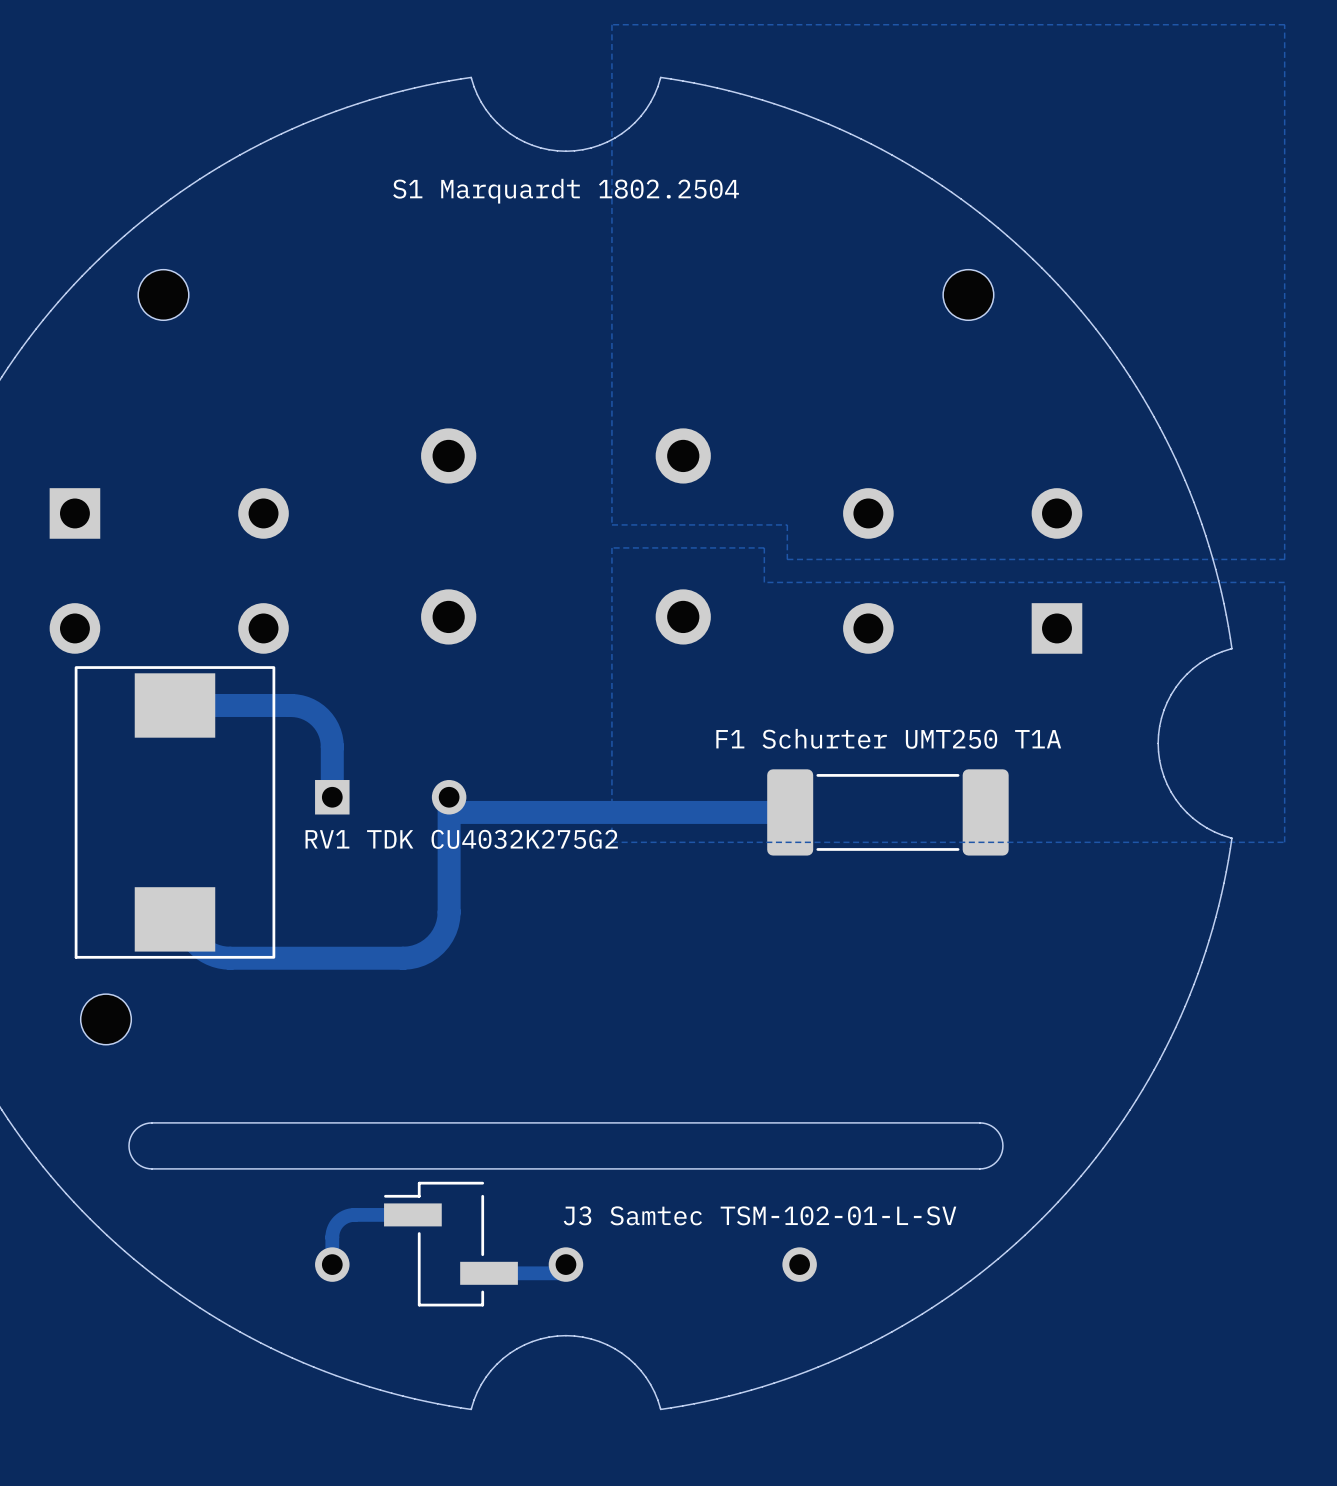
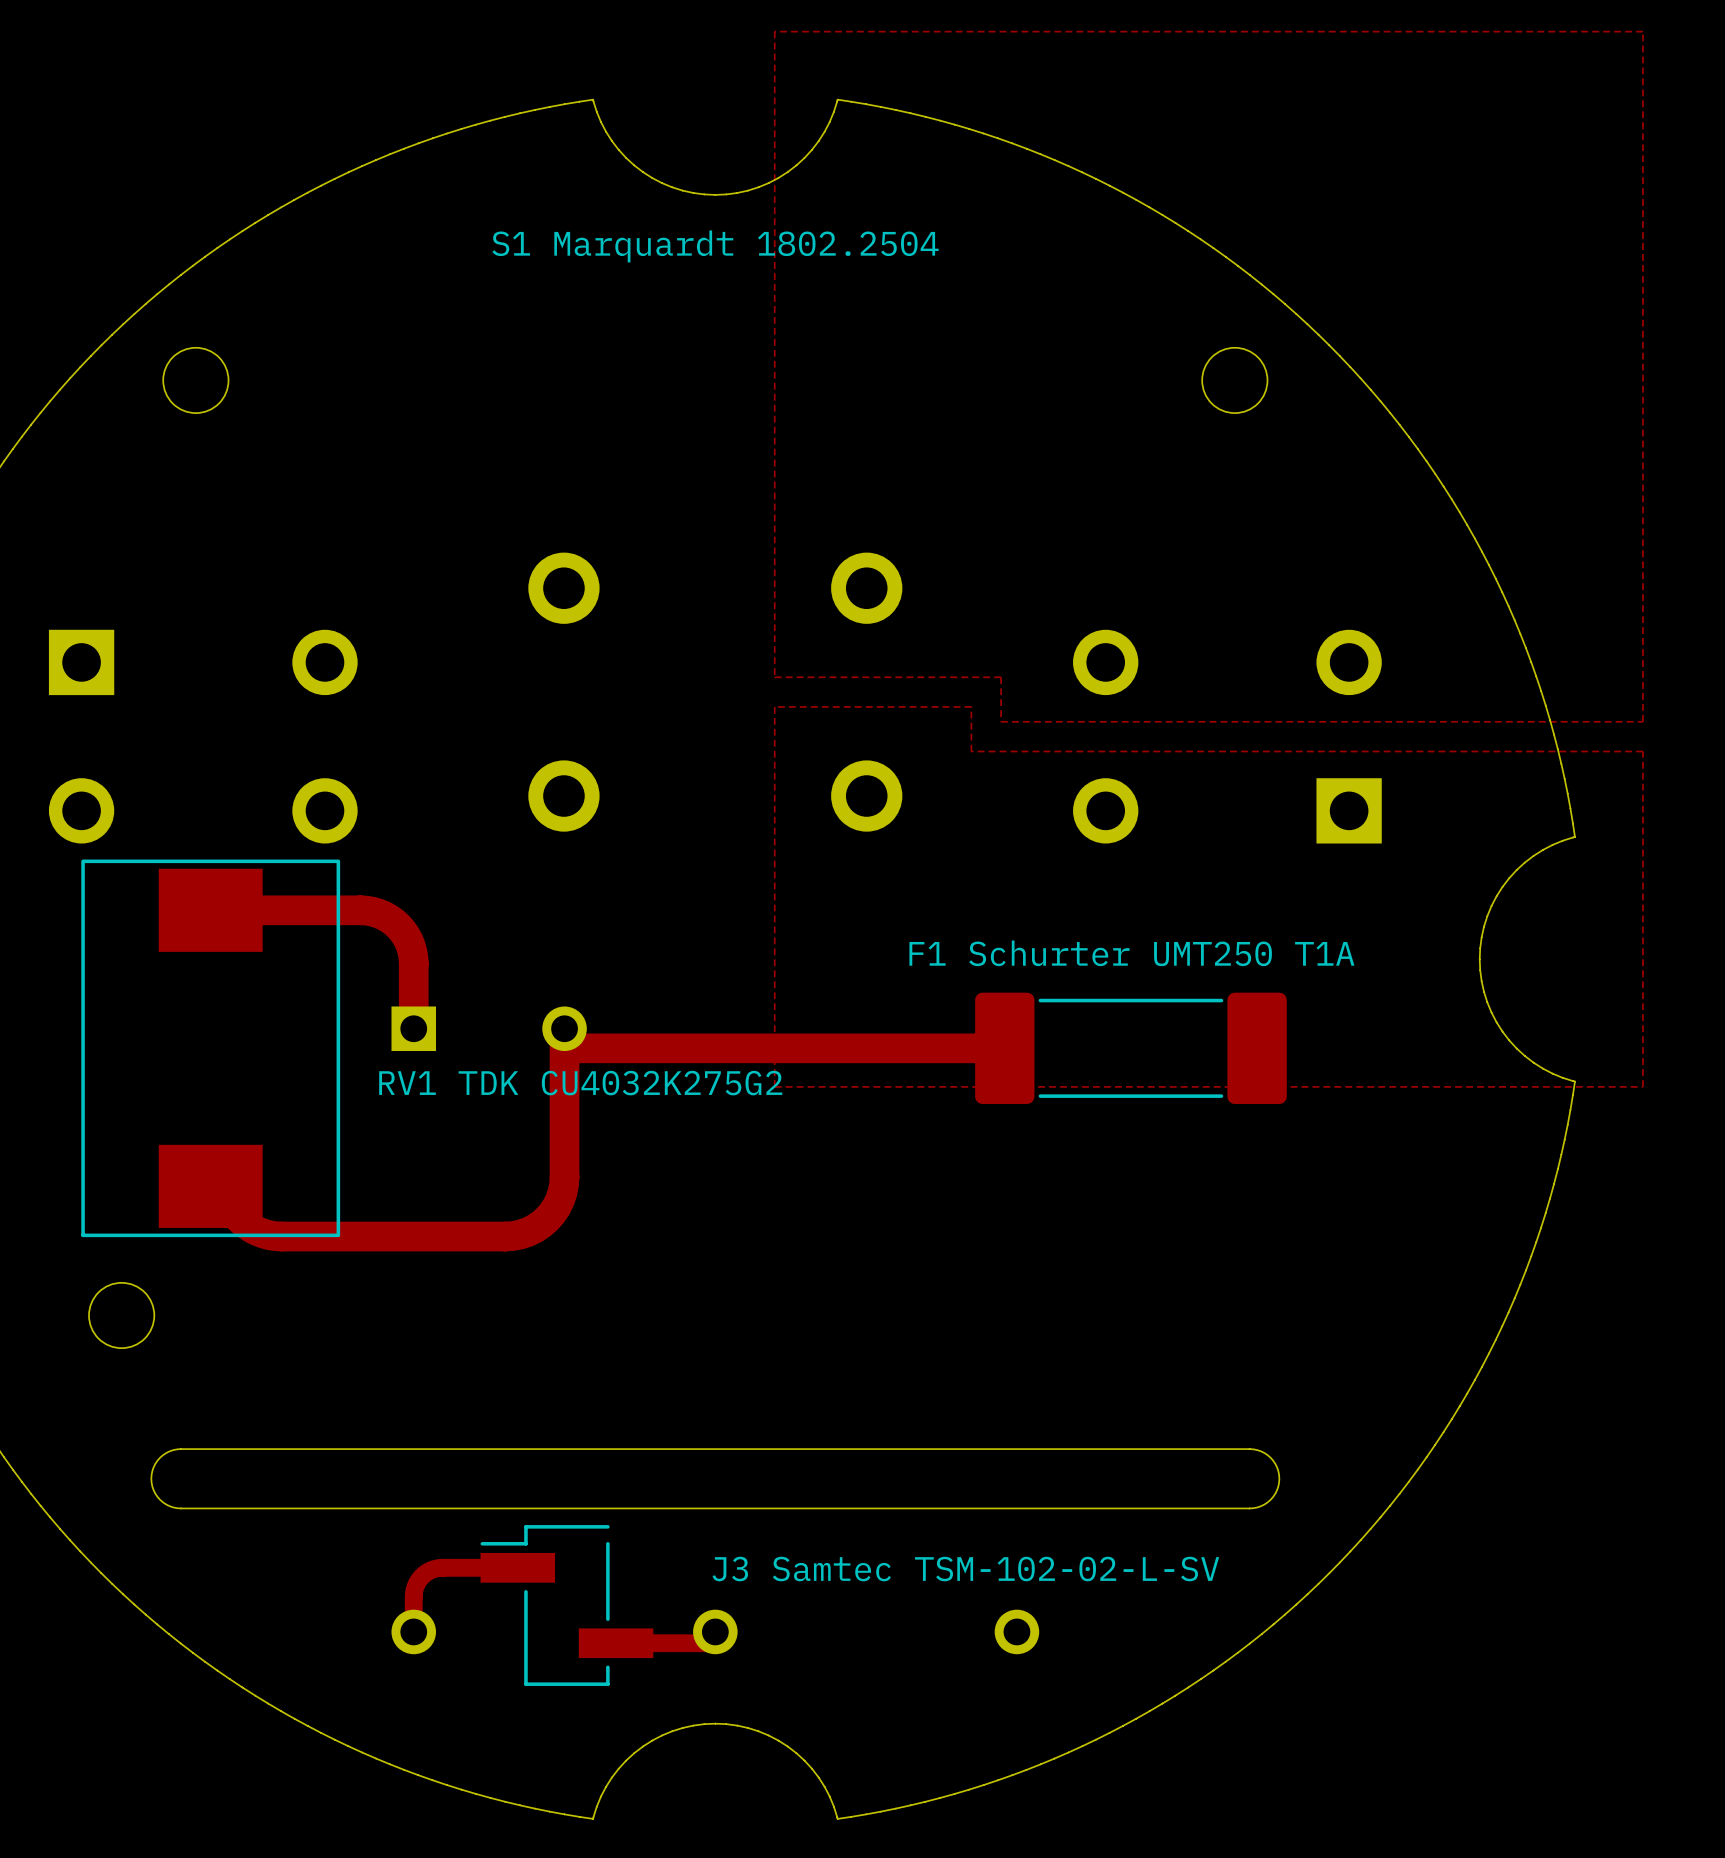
text: J3 Samtec TSM-102-01-L-SV (760, 1215) -> J3 Samtec TSM-102-02-L-SV (965, 1569)

